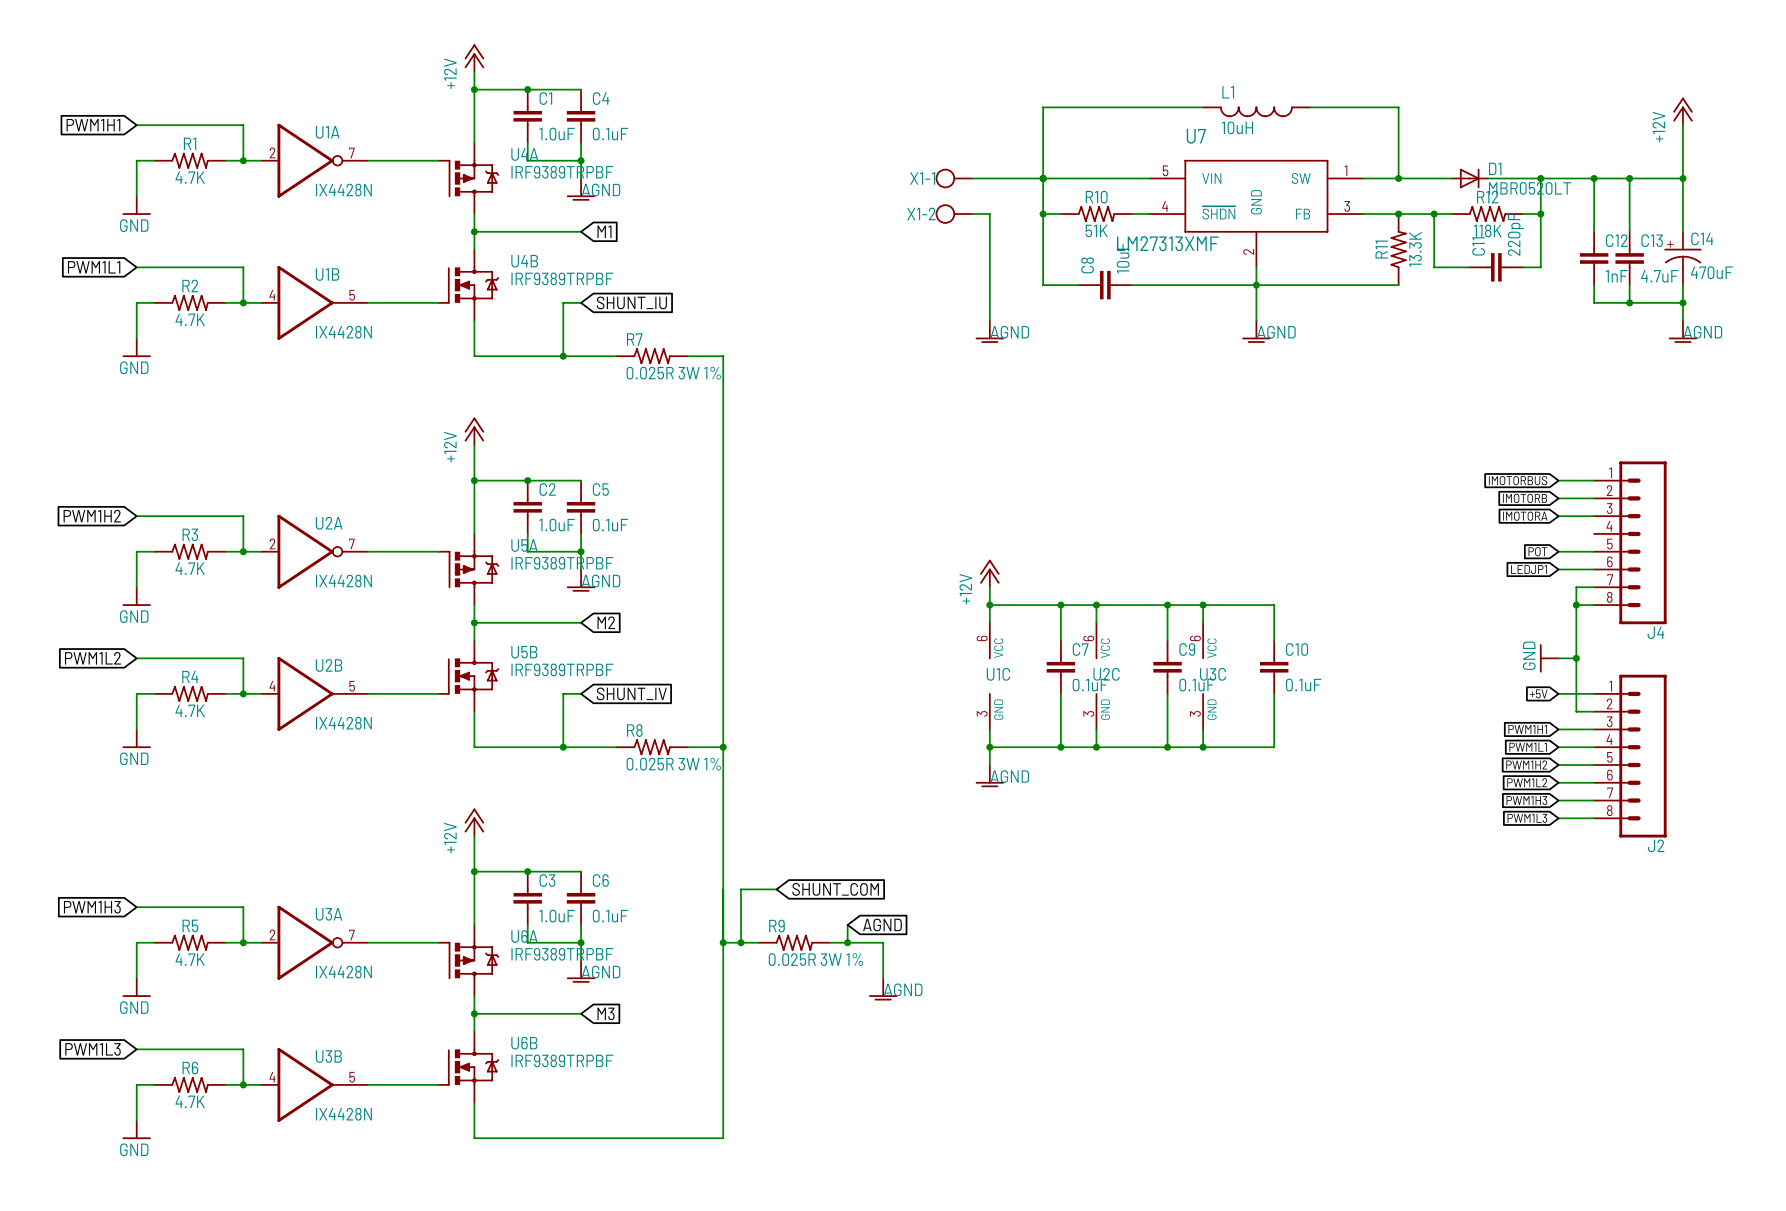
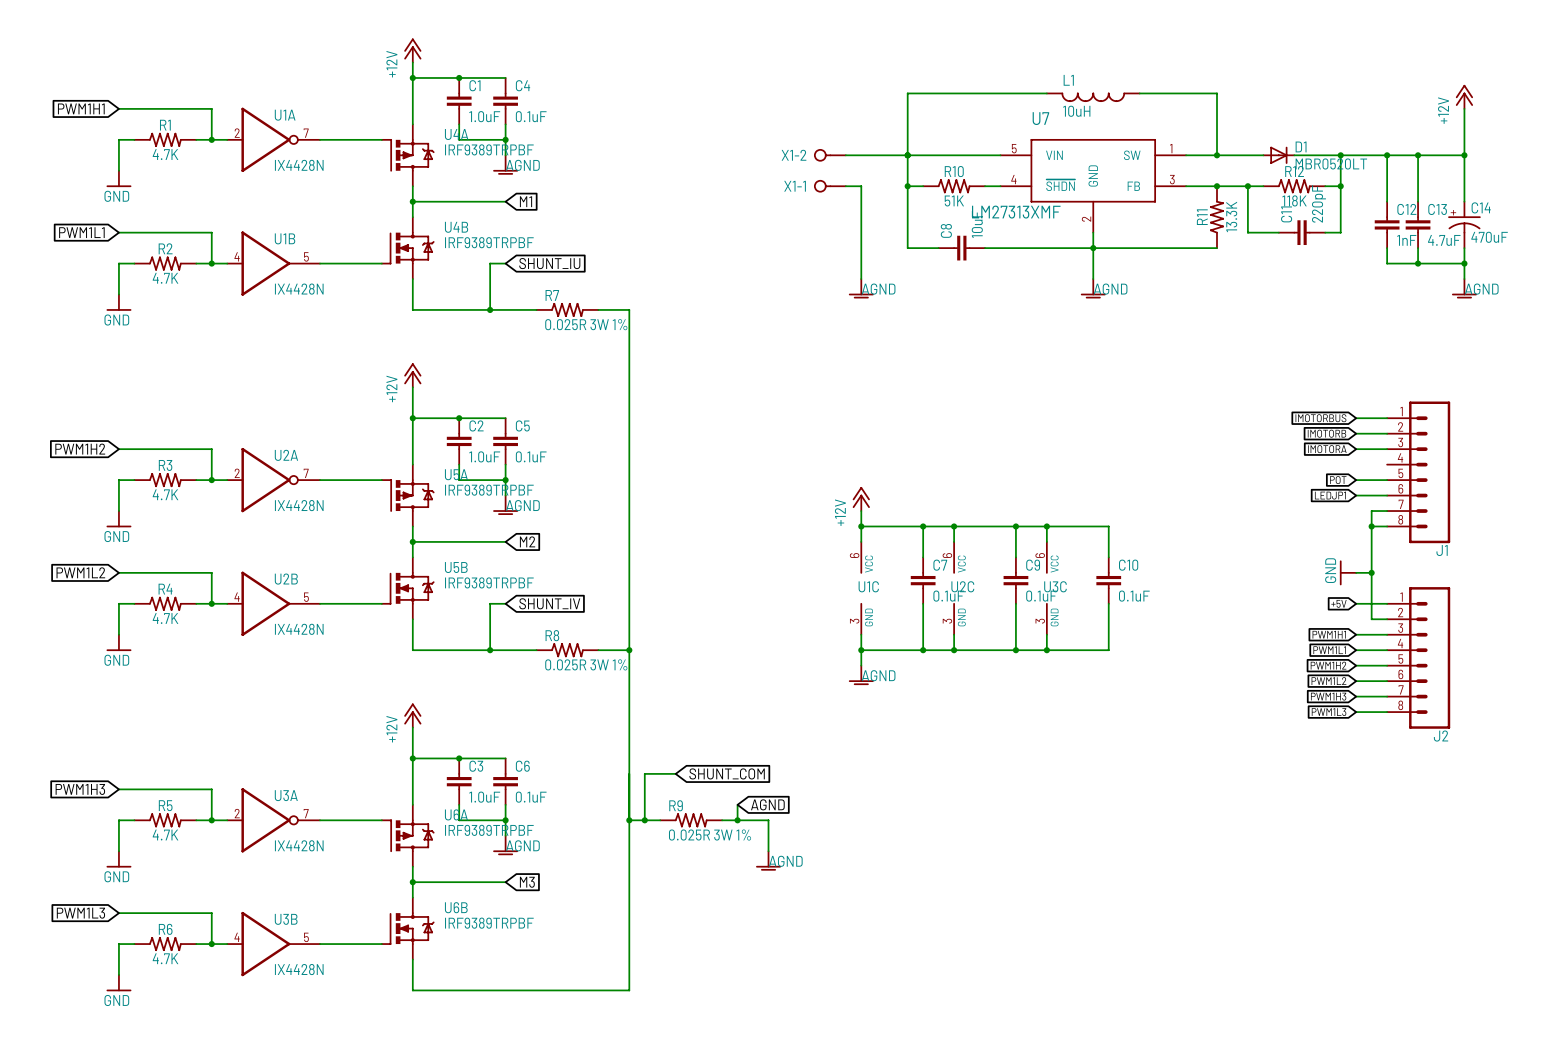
X1-1 symbol: [935, 168, 973, 189] -> [814, 180, 846, 193]
X1-2 symbol: [935, 204, 973, 224] -> [814, 149, 846, 162]
J4 name: J4 (1655, 632) -> J1 (1442, 550)

